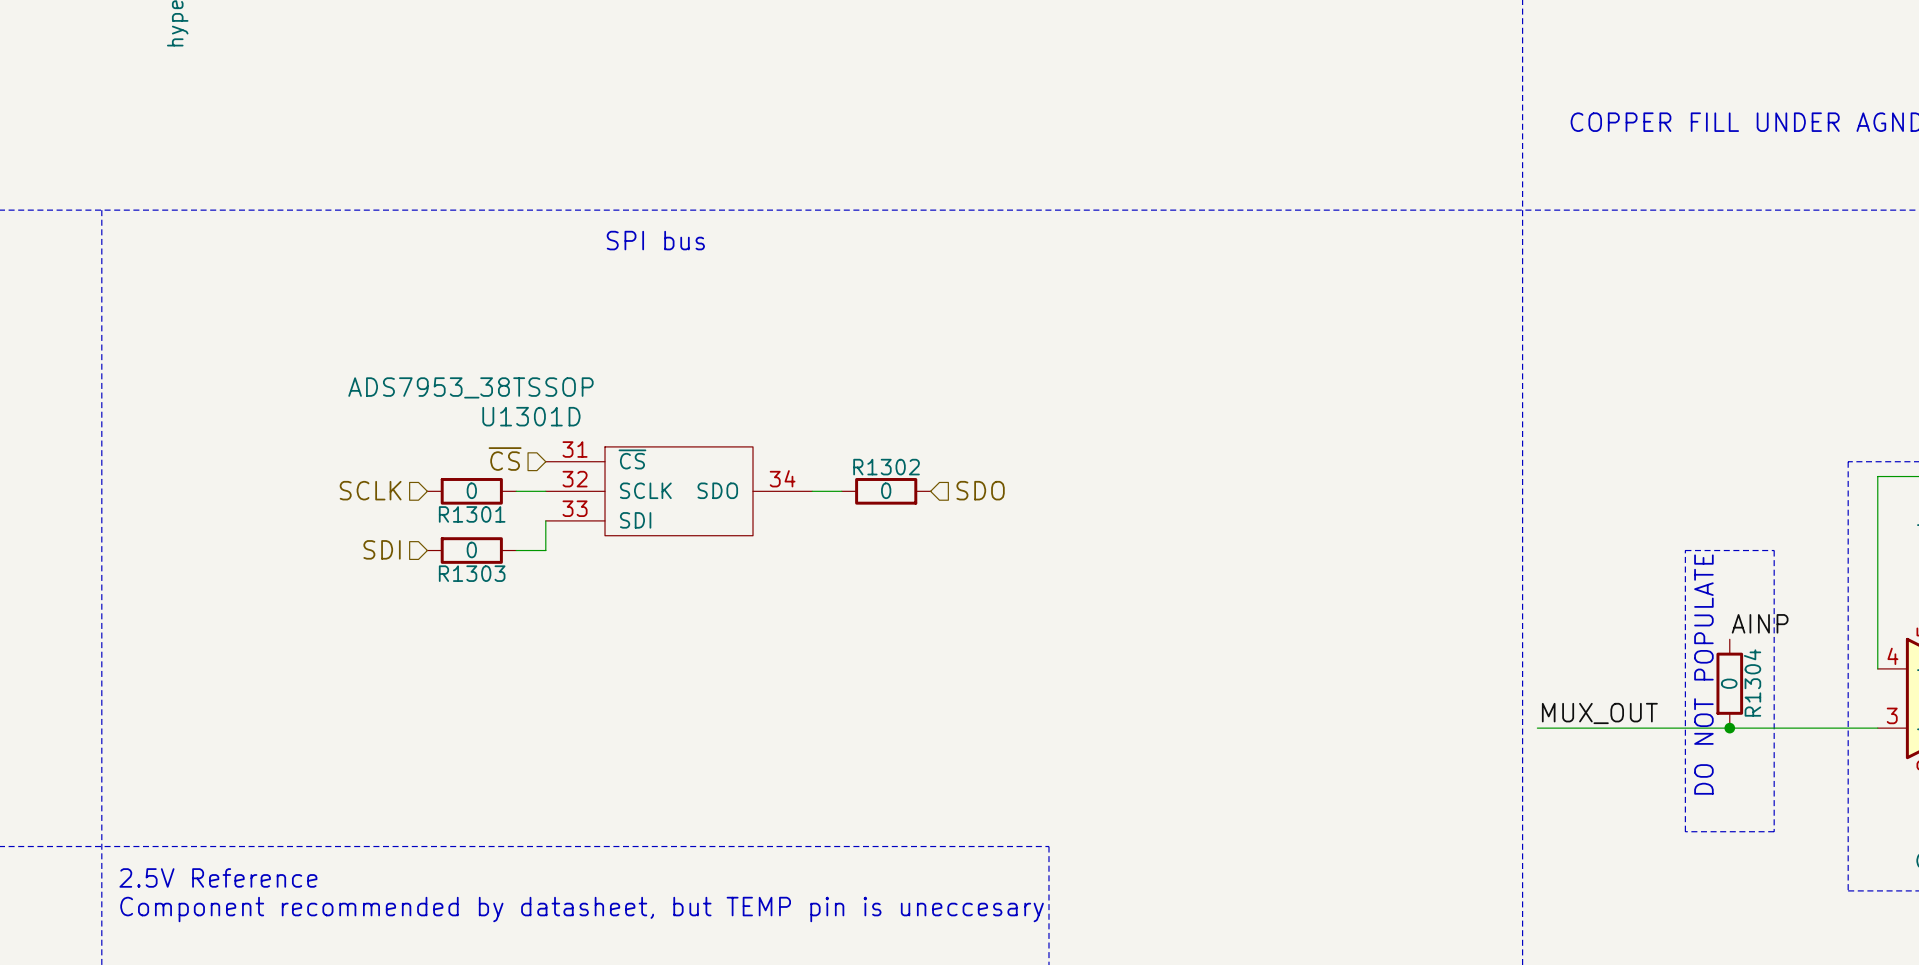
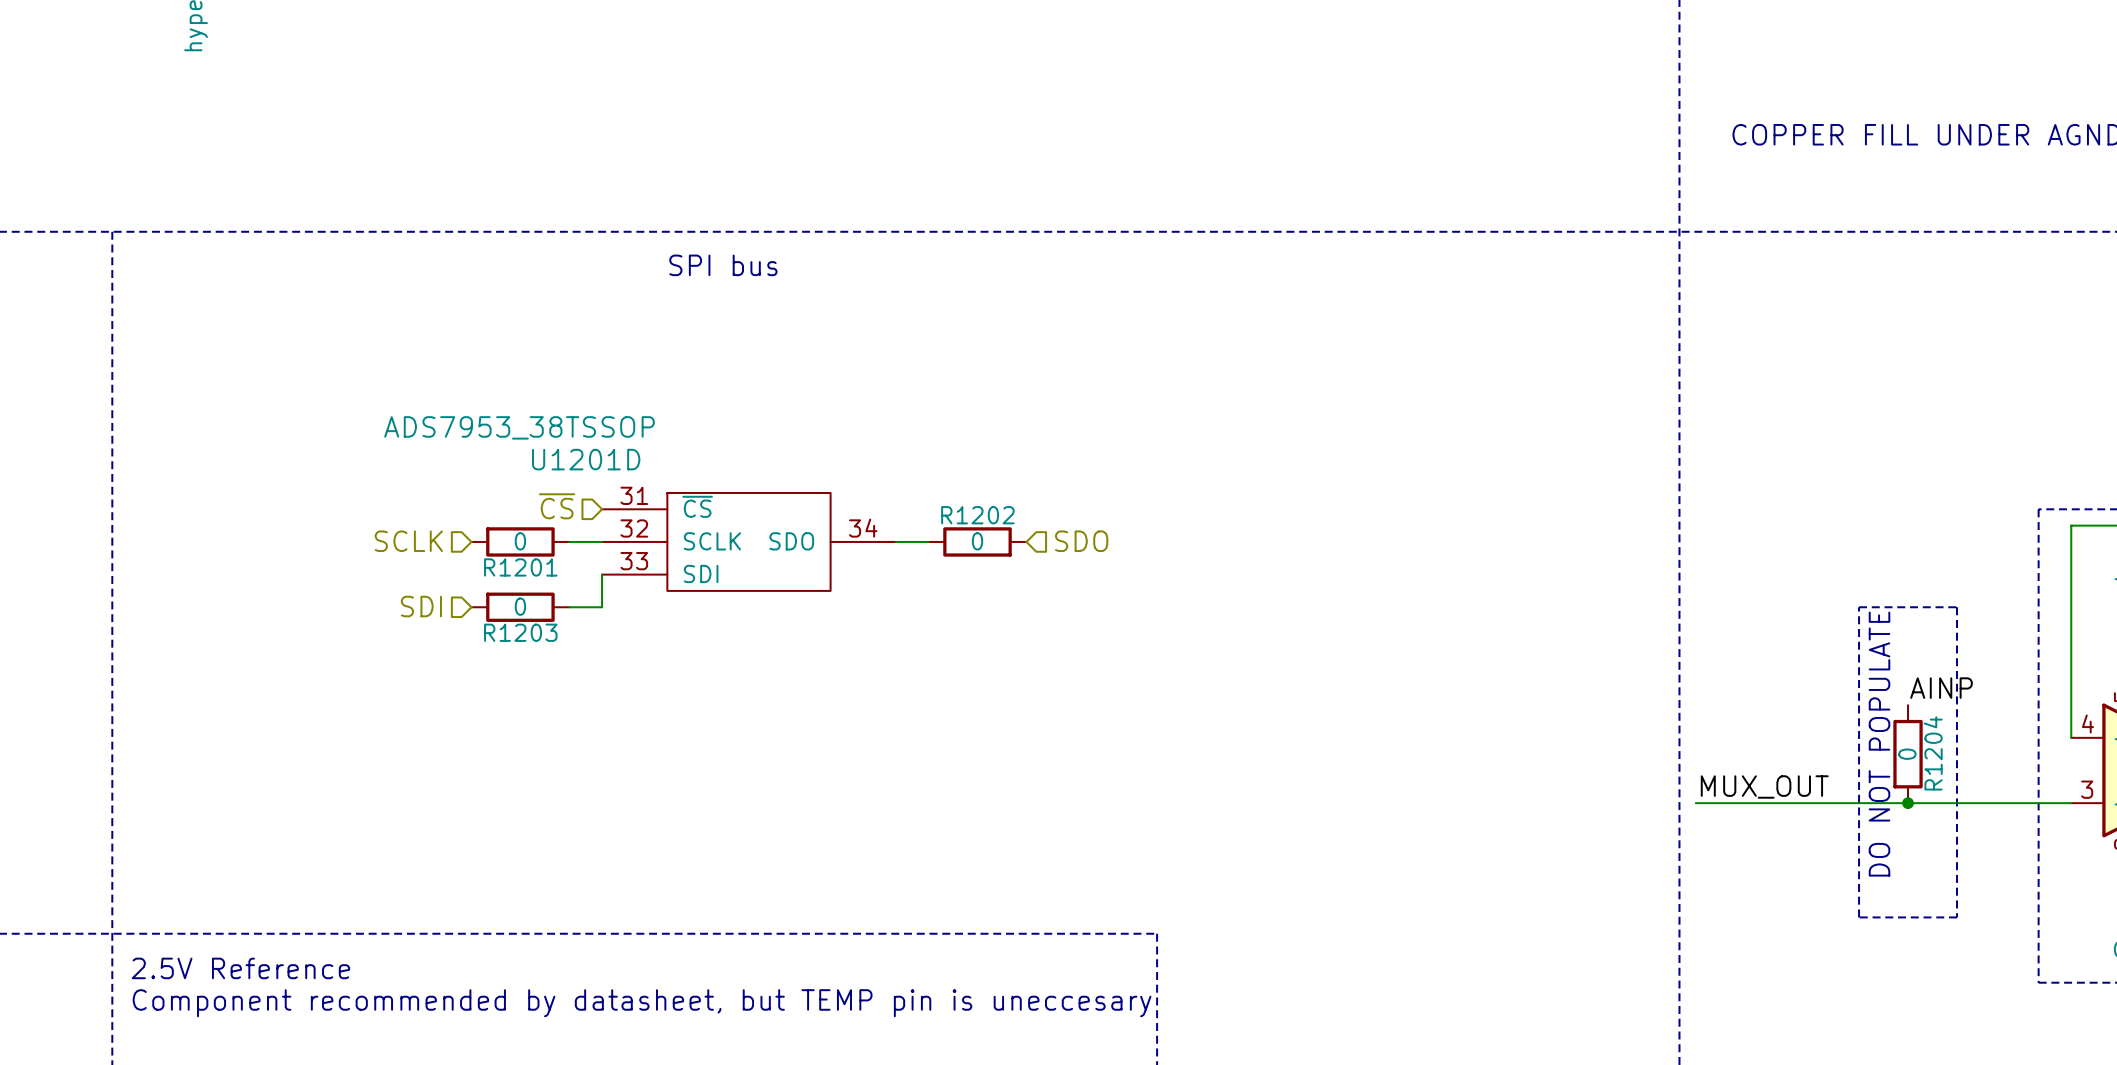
U1301D name: U1301D (531, 416) -> U1201D (586, 459)
R1302 name: R1302 (886, 467) -> R1202 (977, 515)
R1301 name: R1301 (472, 514) -> R1201 (520, 567)
R1303 name: R1303 (472, 573) -> R1203 (520, 632)
R1304 name: R1304 (1752, 683) -> R1204 (1933, 753)

